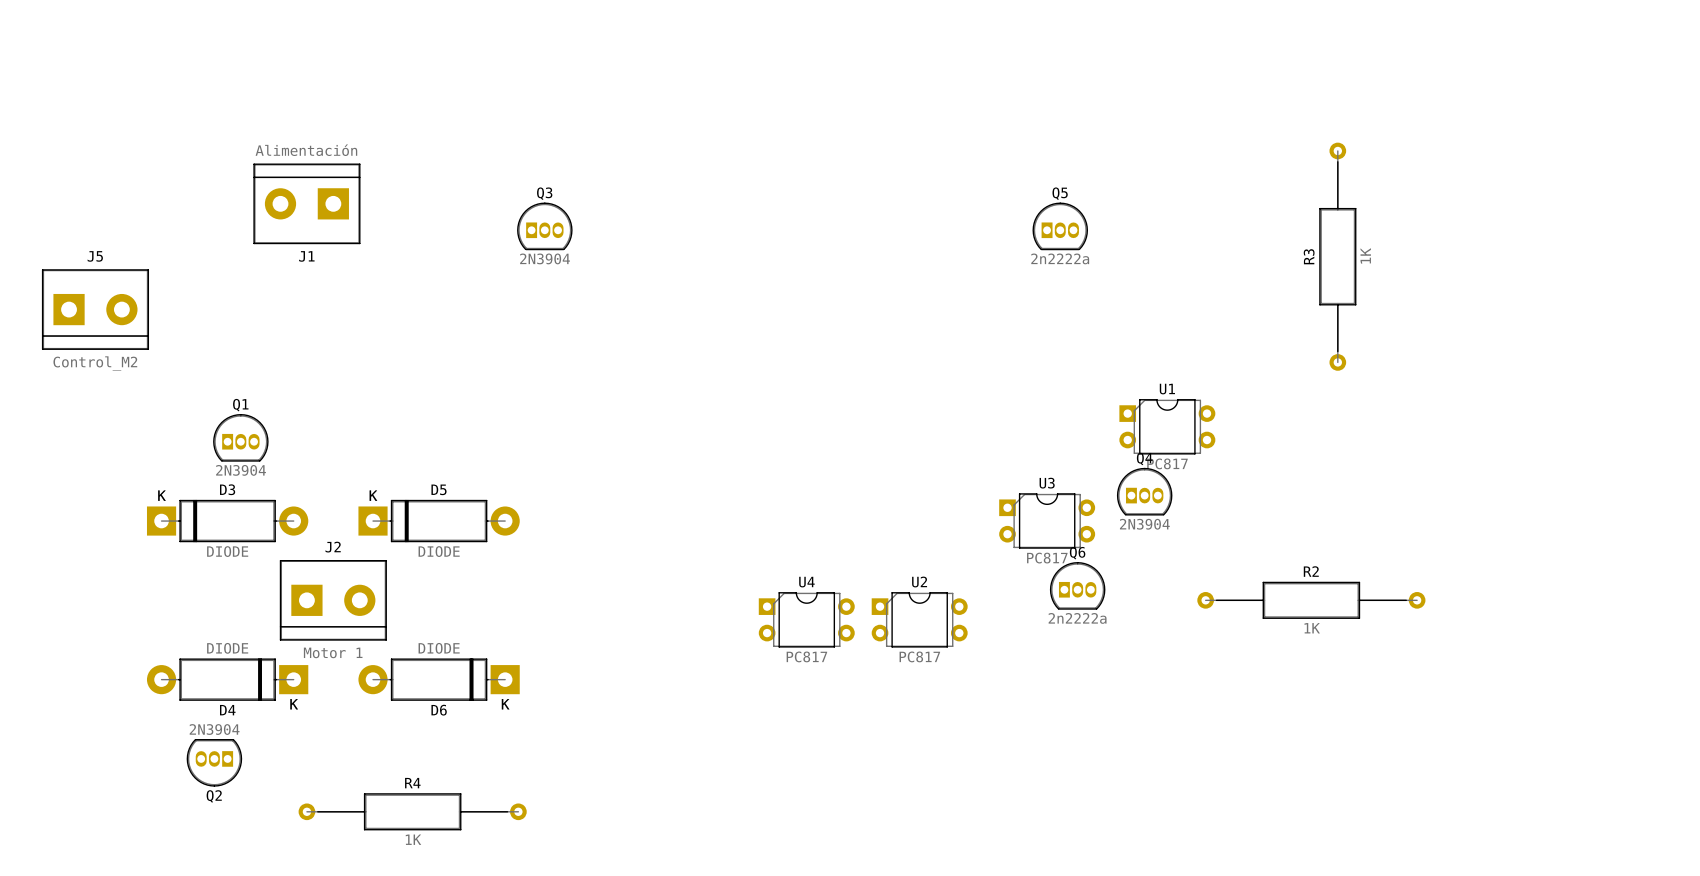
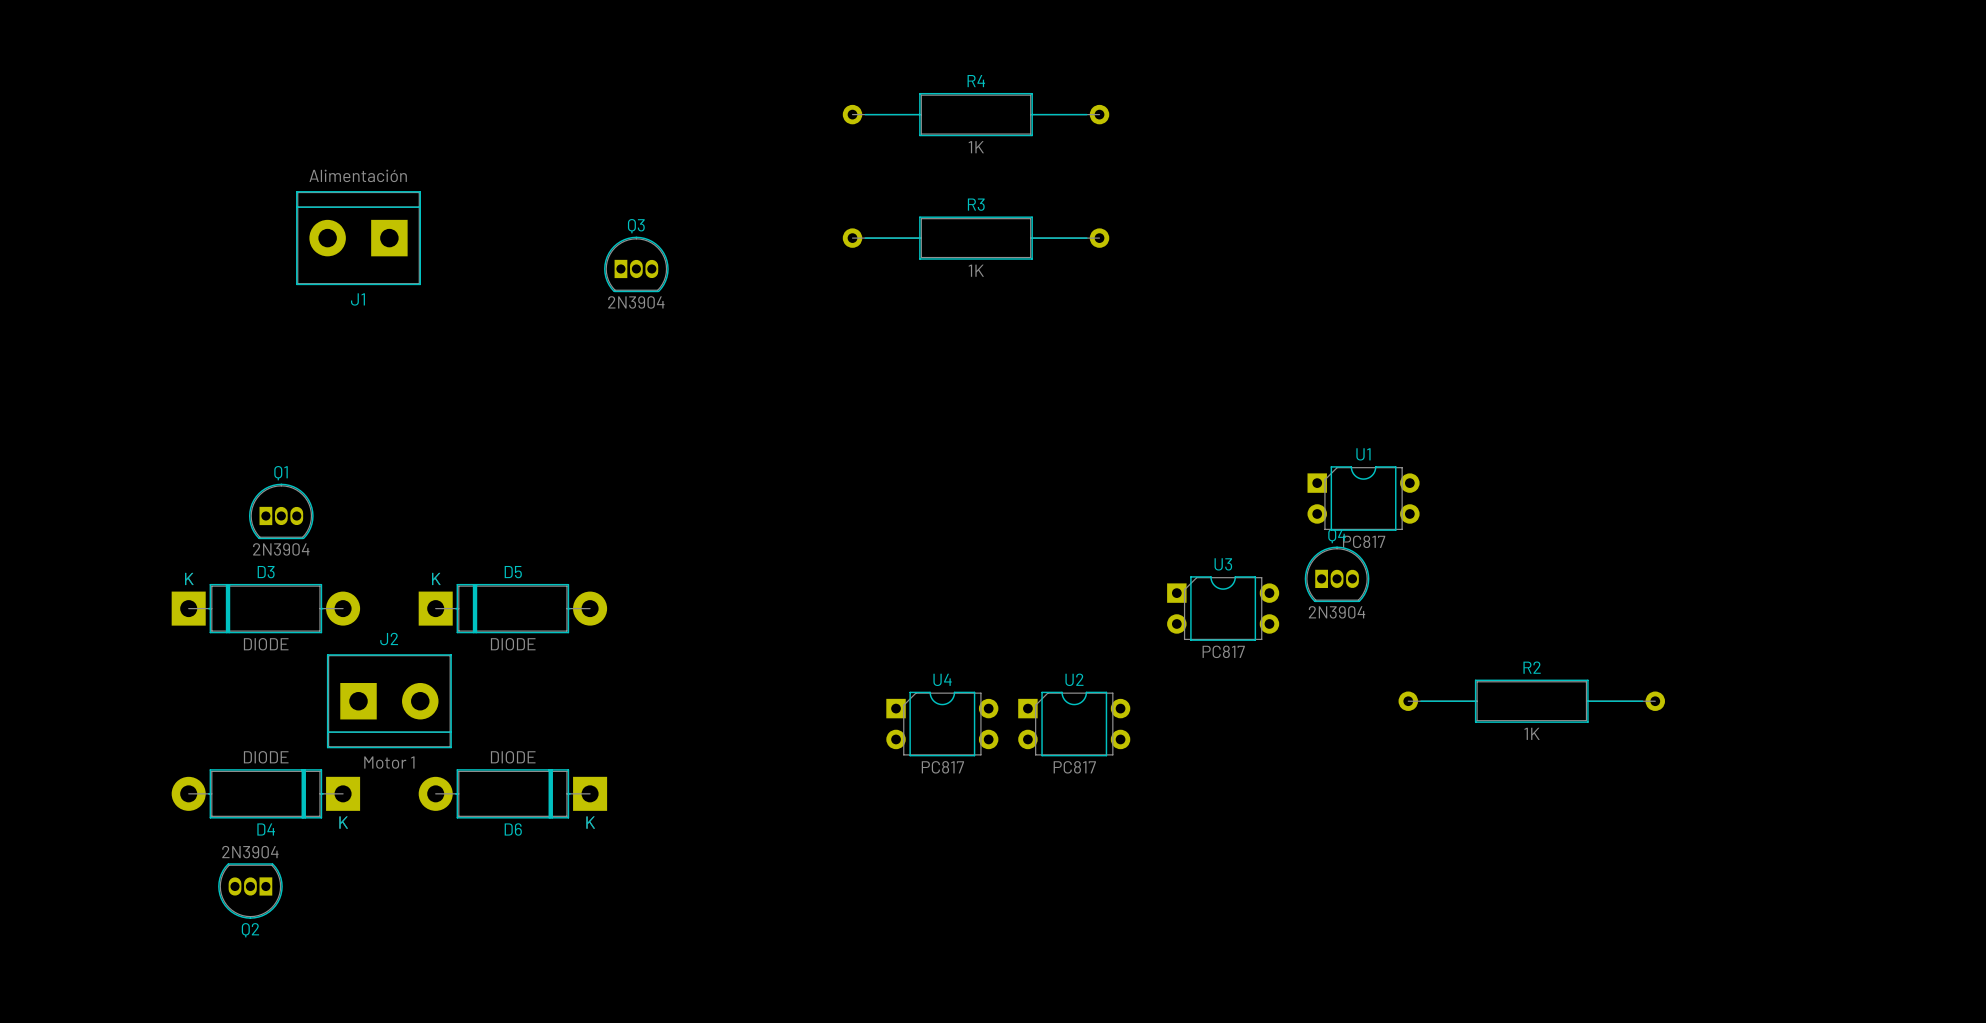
Q5: 2n2222a (1060, 226) -> none
R3 rotation: 0° (1337, 256) -> 90° clockwise (976, 238)
R3 position: (1337, 256) -> (976, 238)
J5: Control_M2 (95, 309) -> none
Q6: 2n2222a (1077, 585) -> none
R4 position: (412, 811) -> (976, 114)

